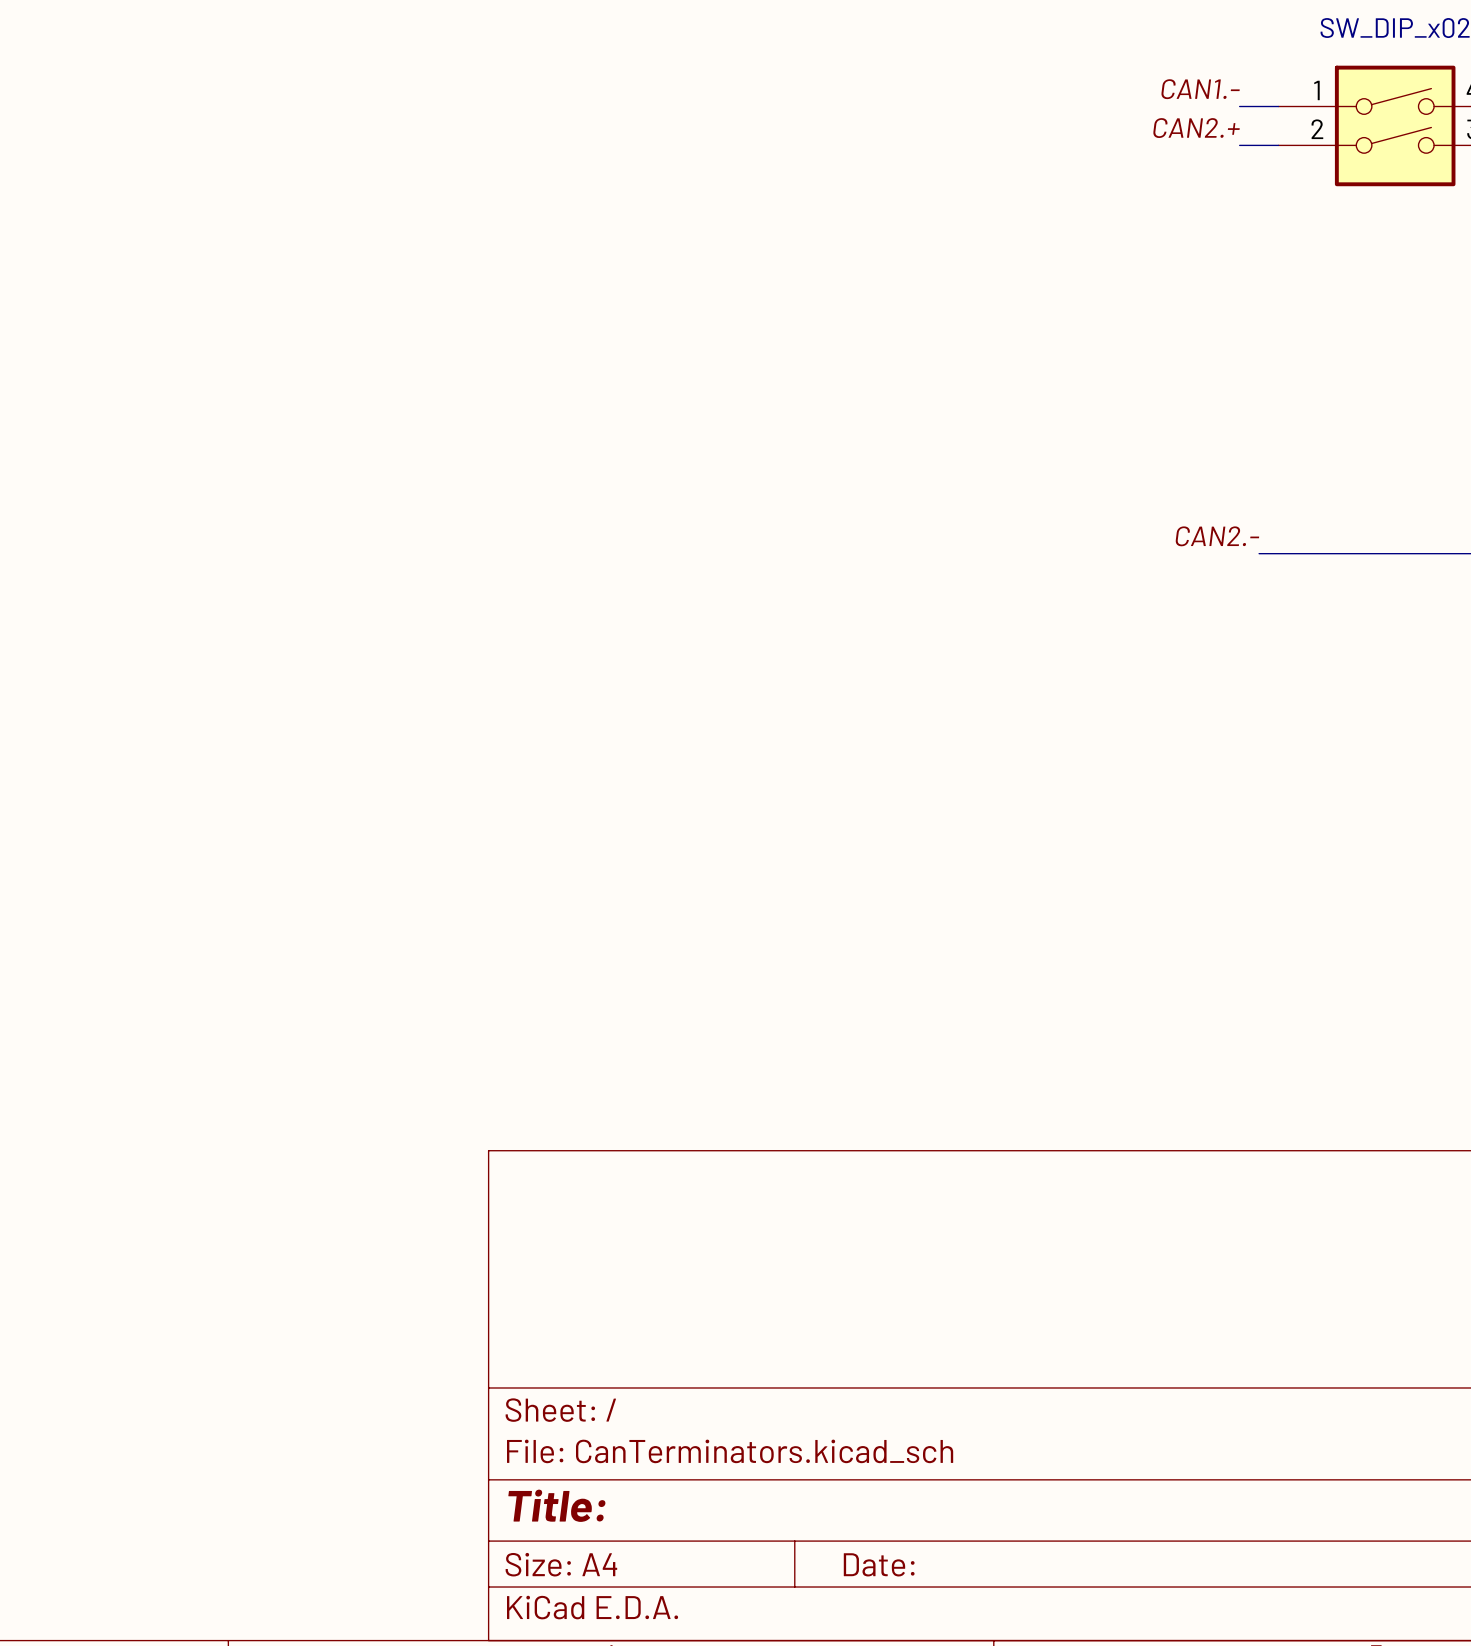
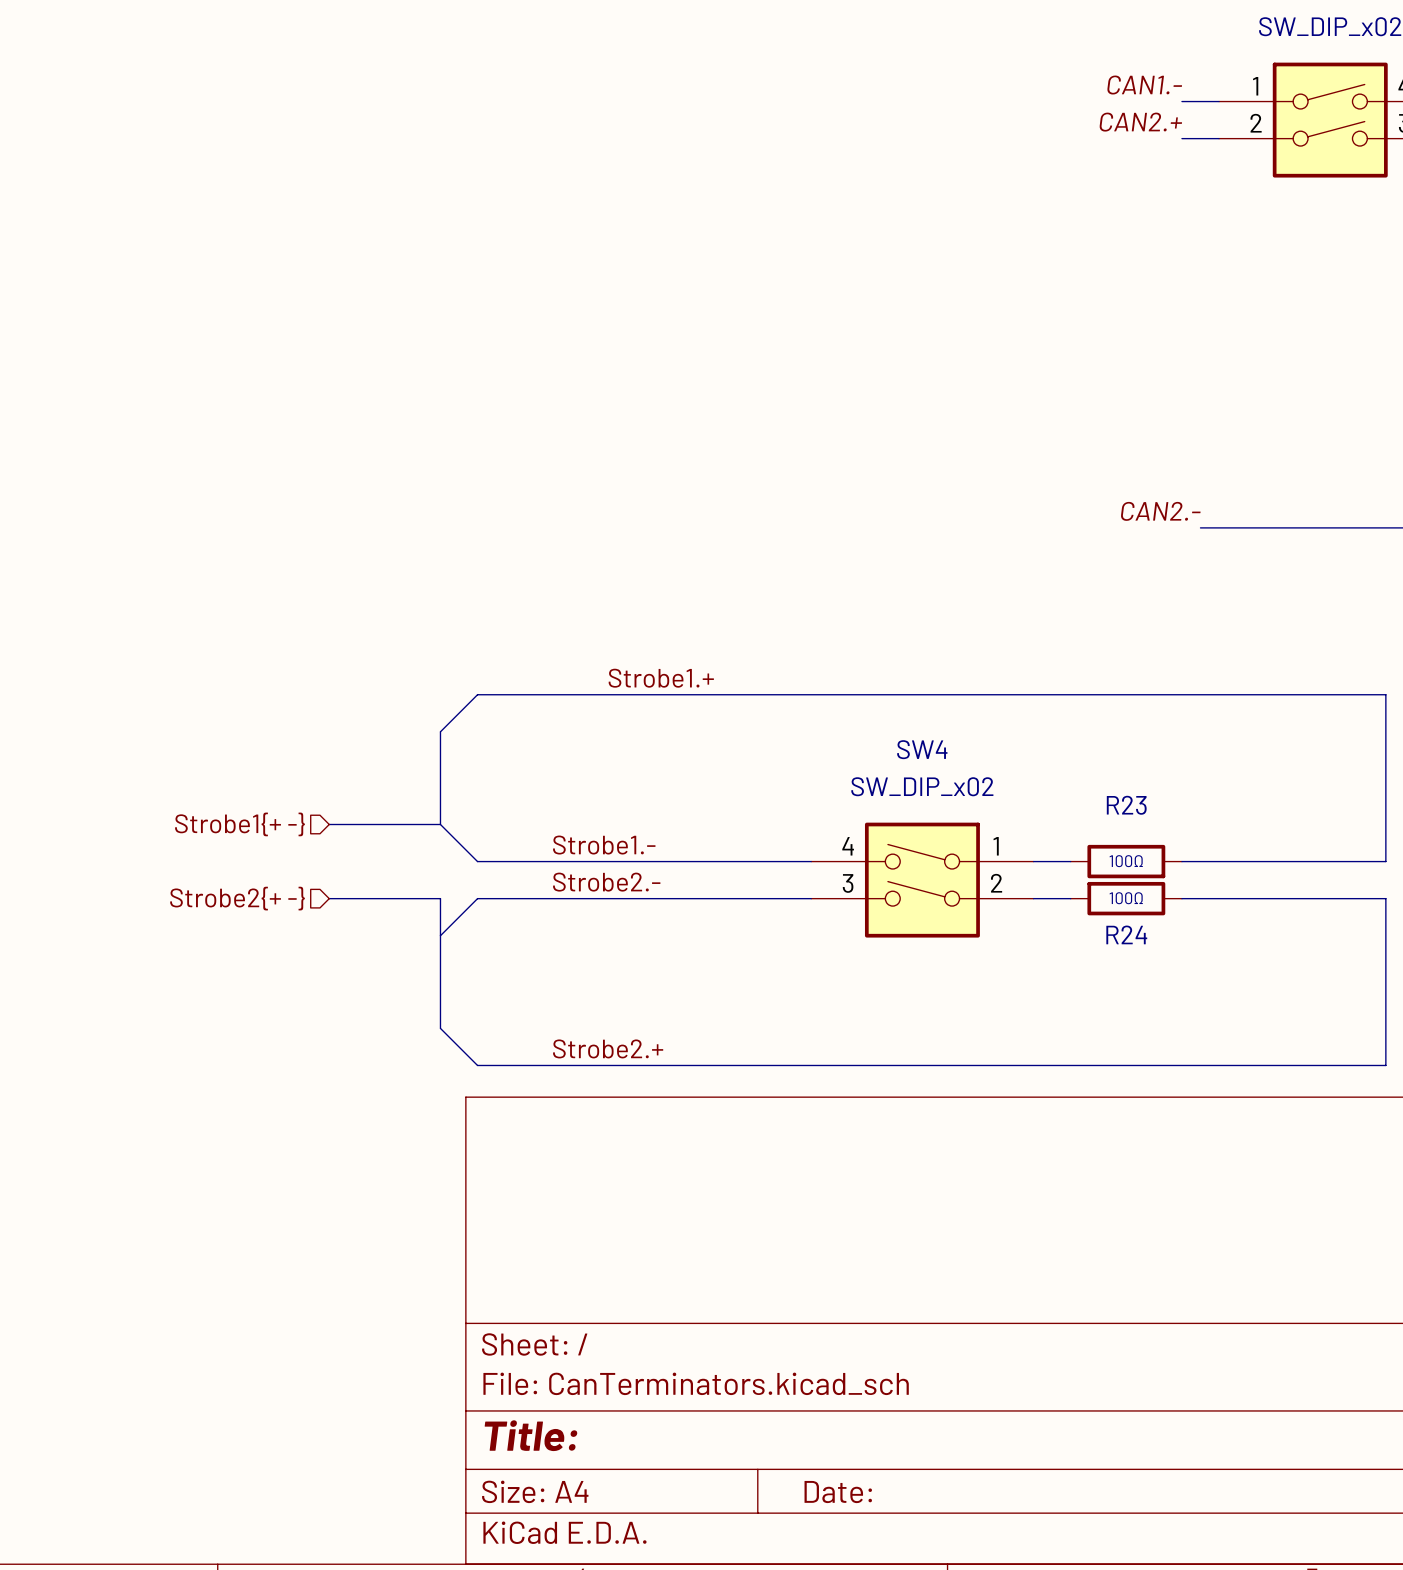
label: none -> Strobe1.+ (661, 678)
wire: none -> (440, 731) (477, 694) (1385, 694) (1385, 861) (1181, 861)
bus: none -> (440, 731) (440, 824) (329, 824)
hierarchical label: none -> Strobe1{+ -} (239, 824)
wire: none -> (440, 824) (477, 861) (811, 861)
label: none -> Strobe1.- (604, 845)
wire: none -> (1033, 861) (1070, 861)
R23: none -> 100Ω (1126, 861)
SW4: none -> SW_DIP_x02 (922, 880)
label: none -> Strobe2.- (606, 882)
hierarchical label: none -> Strobe2{+ -} (237, 898)
bus: none -> (329, 898) (440, 898) (440, 1028)
wire: none -> (811, 898) (477, 898) (440, 935)
wire: none -> (1033, 898) (1070, 898)
R24: none -> 100Ω (1126, 898)
wire: none -> (1181, 898) (1385, 898) (1385, 1065) (477, 1065) (440, 1028)
label: none -> Strobe2.+ (608, 1048)

